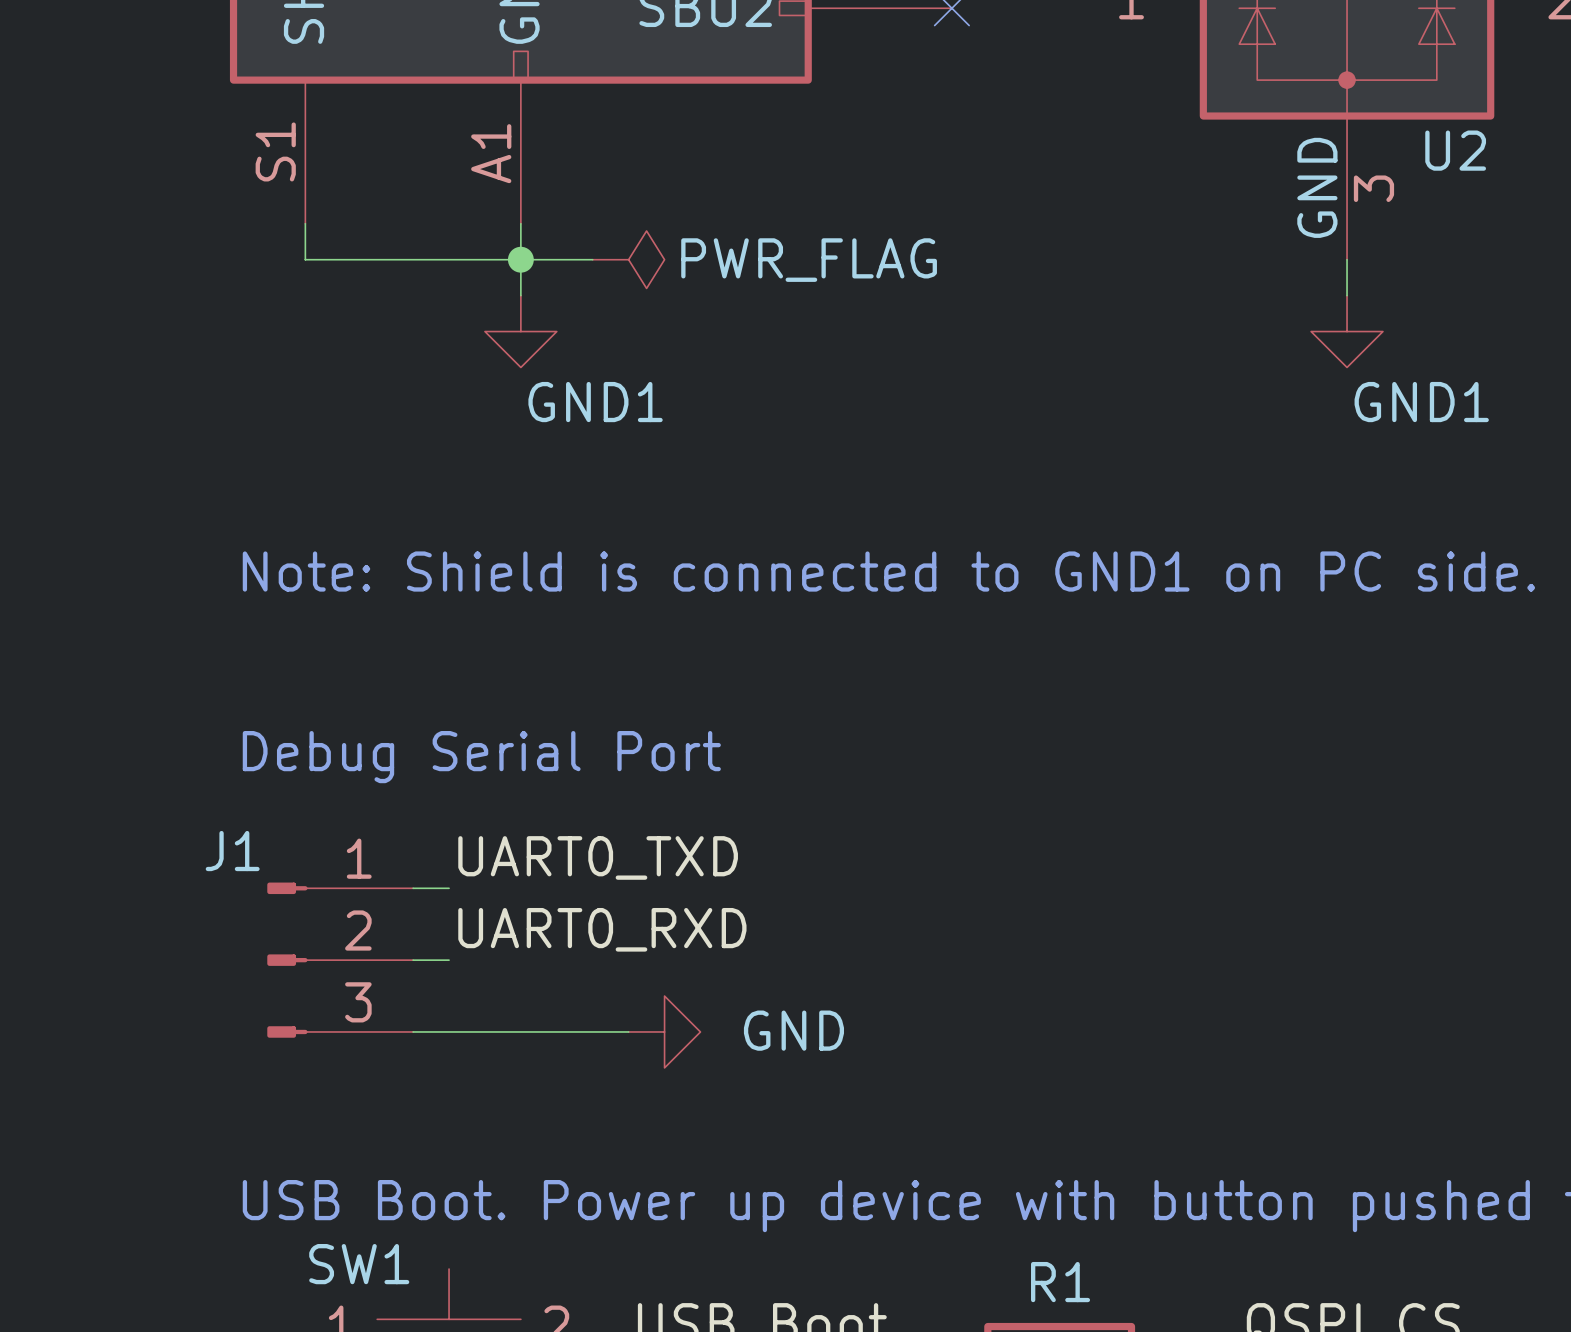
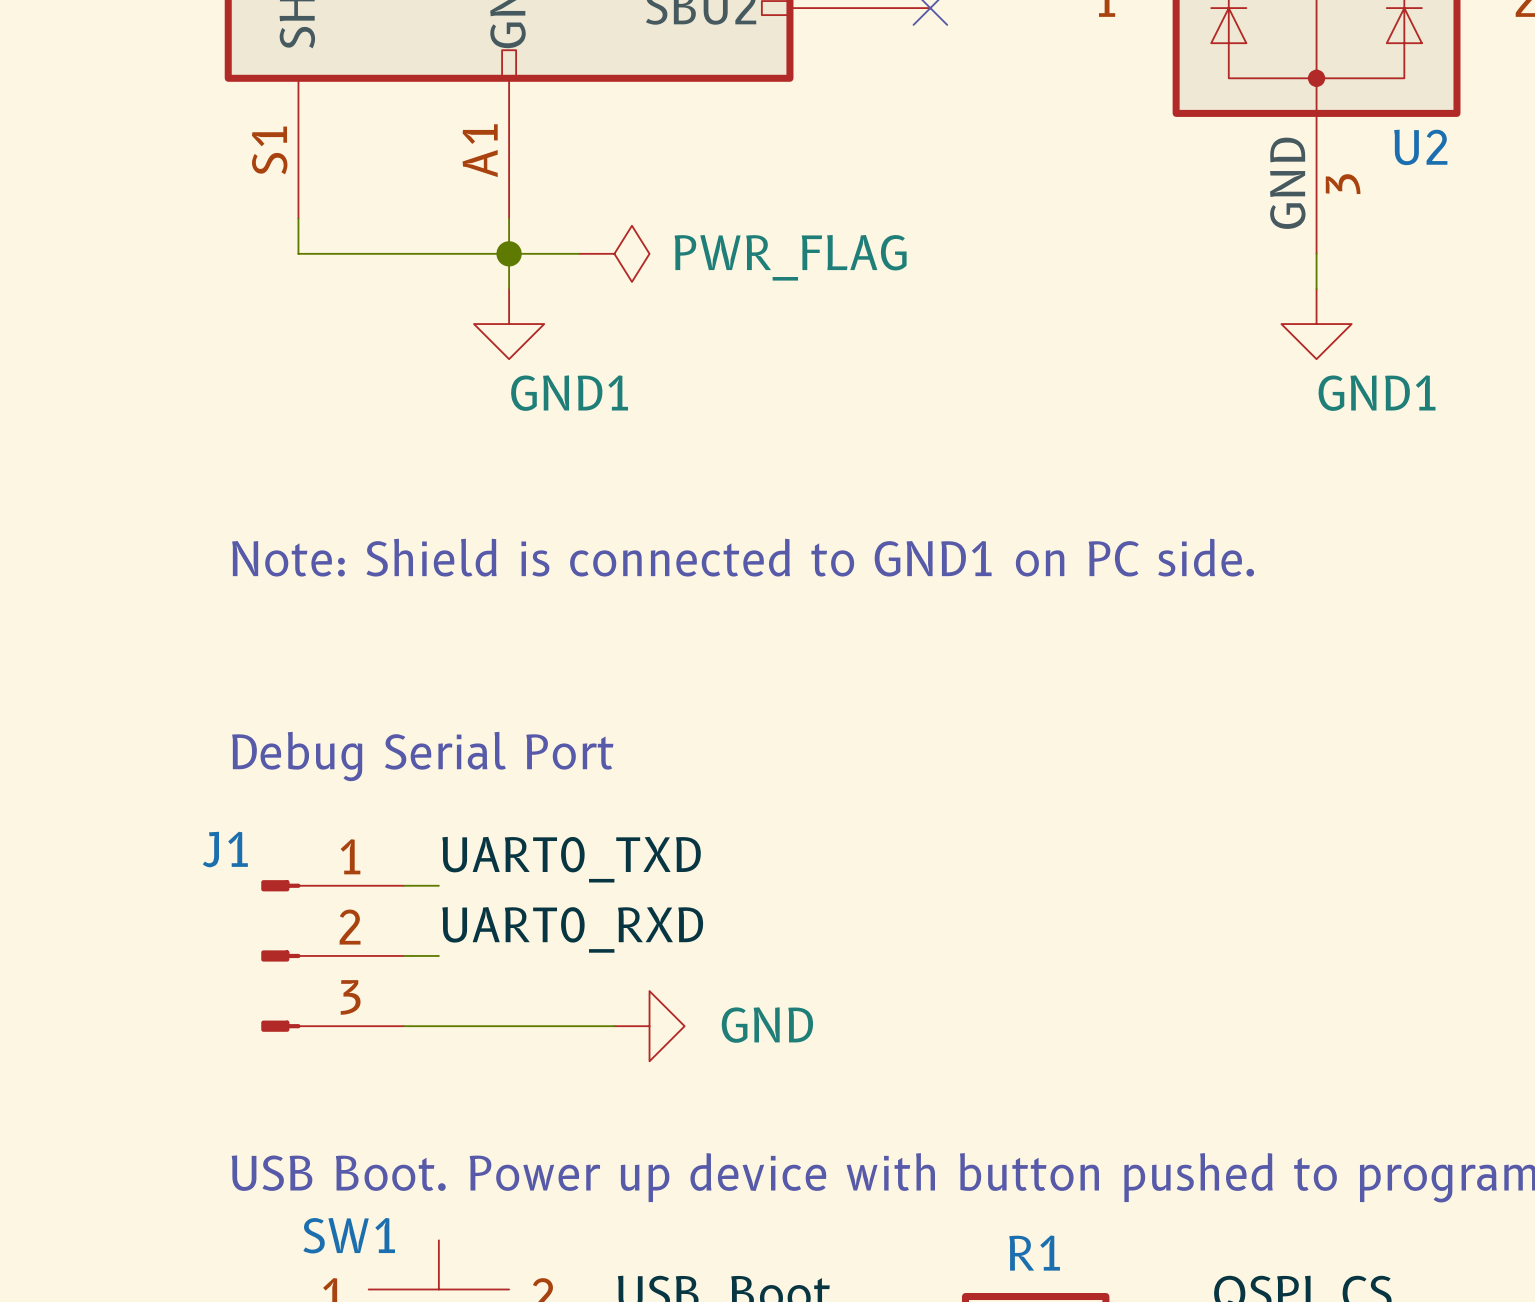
text position: Debug Serial Port (481, 757) -> Debug Serial Port (422, 756)
label position: UART0_TXD (598, 857) -> UART0_TXD (571, 859)
wire: (413, 888) (449, 888) -> (403, 885) (438, 885)
label position: UART0_RXD (602, 929) -> UART0_RXD (572, 929)
J1 position: (340, 960) -> (332, 955)
wire: (413, 960) (449, 960) -> (403, 955) (438, 955)
wire: (413, 1031) (628, 1031) -> (403, 1026) (614, 1026)
power symbol position: GND (664, 1031) -> GND (649, 1026)

